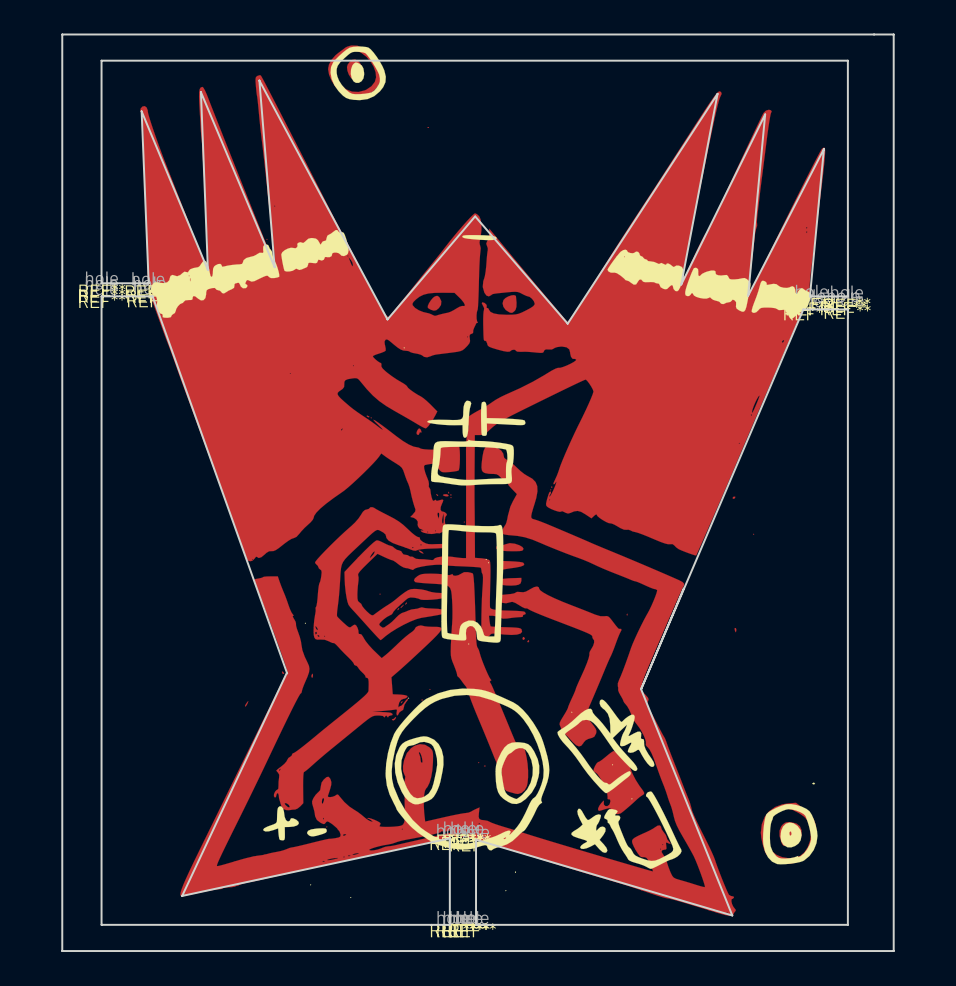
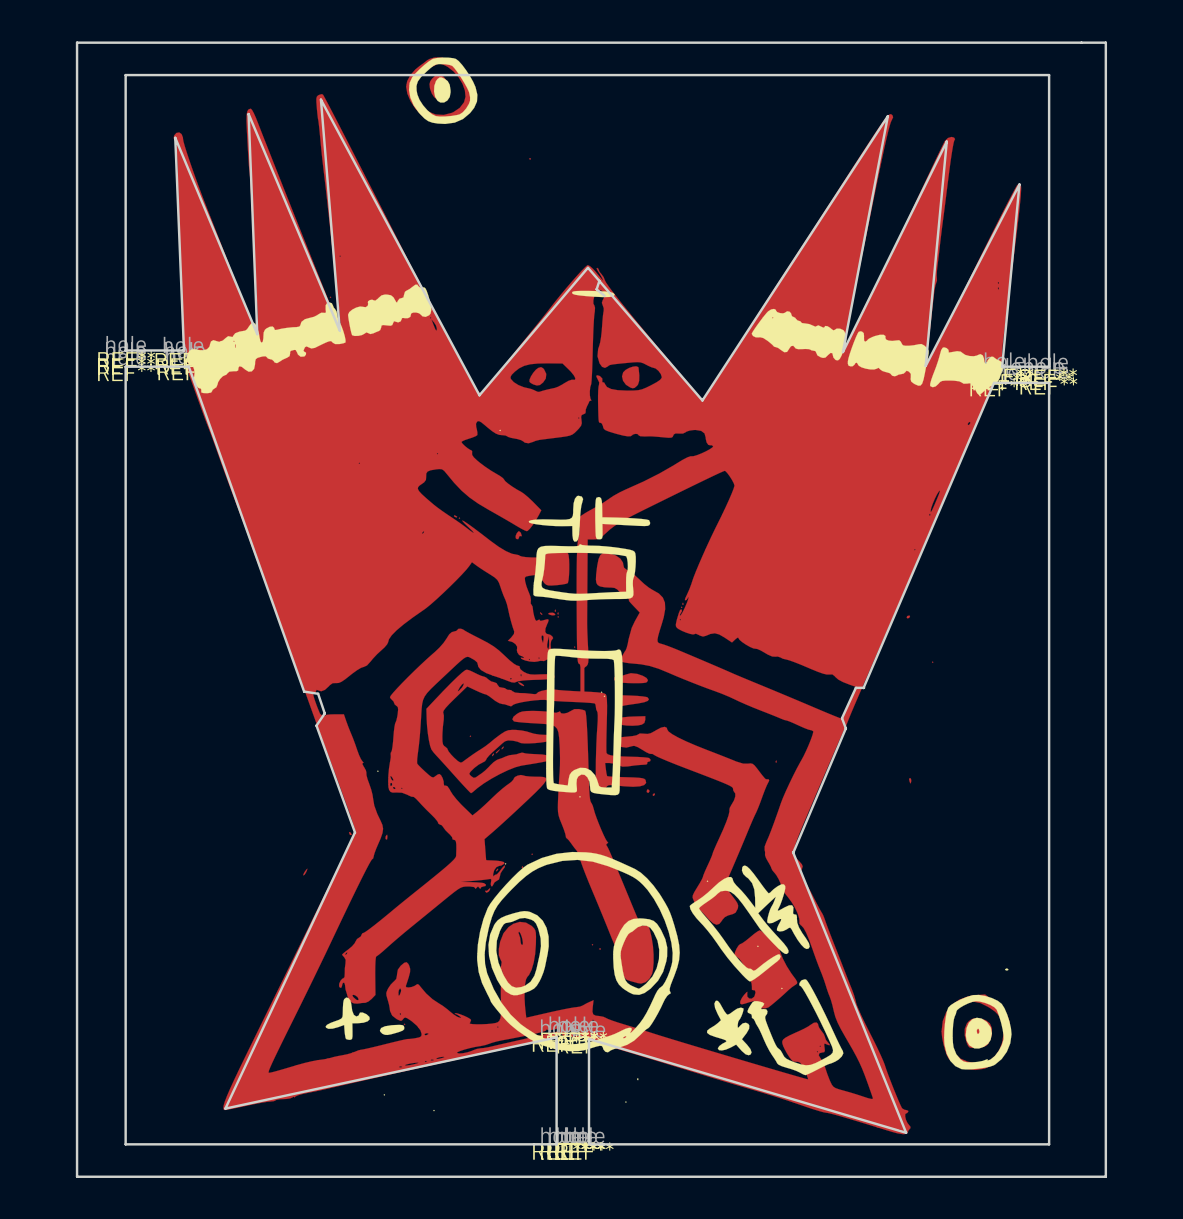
drawing shape: [140, 45, 826, 916] -> [173, 57, 1022, 1135]
board edge: none -> (599, 280) (596, 289) (604, 295)
board edge: (152, 296) (287, 673) -> (188, 366) (304, 691)
board edge: none -> (864, 687) (855, 687) (842, 718) (845, 728)
board edge: none -> (304, 691) (318, 693) (324, 713) (316, 725) (355, 832)

